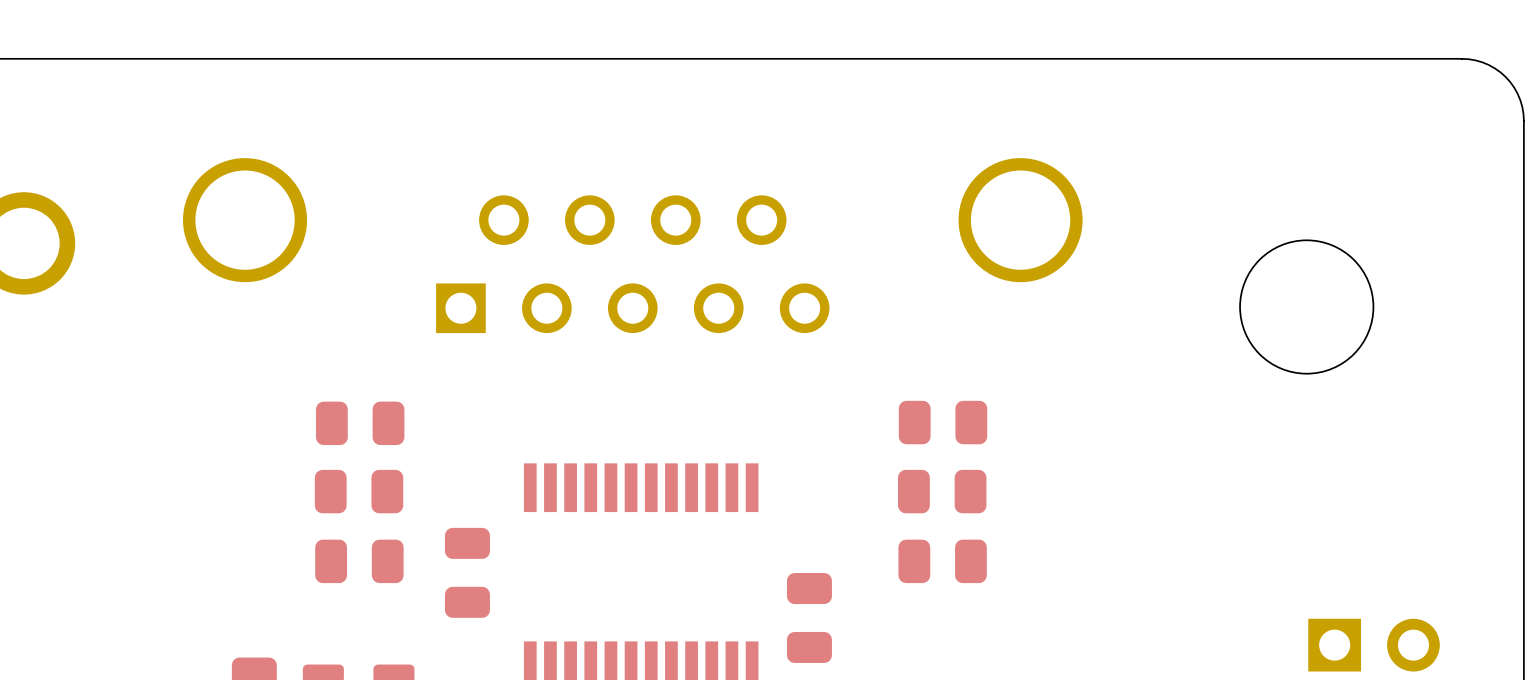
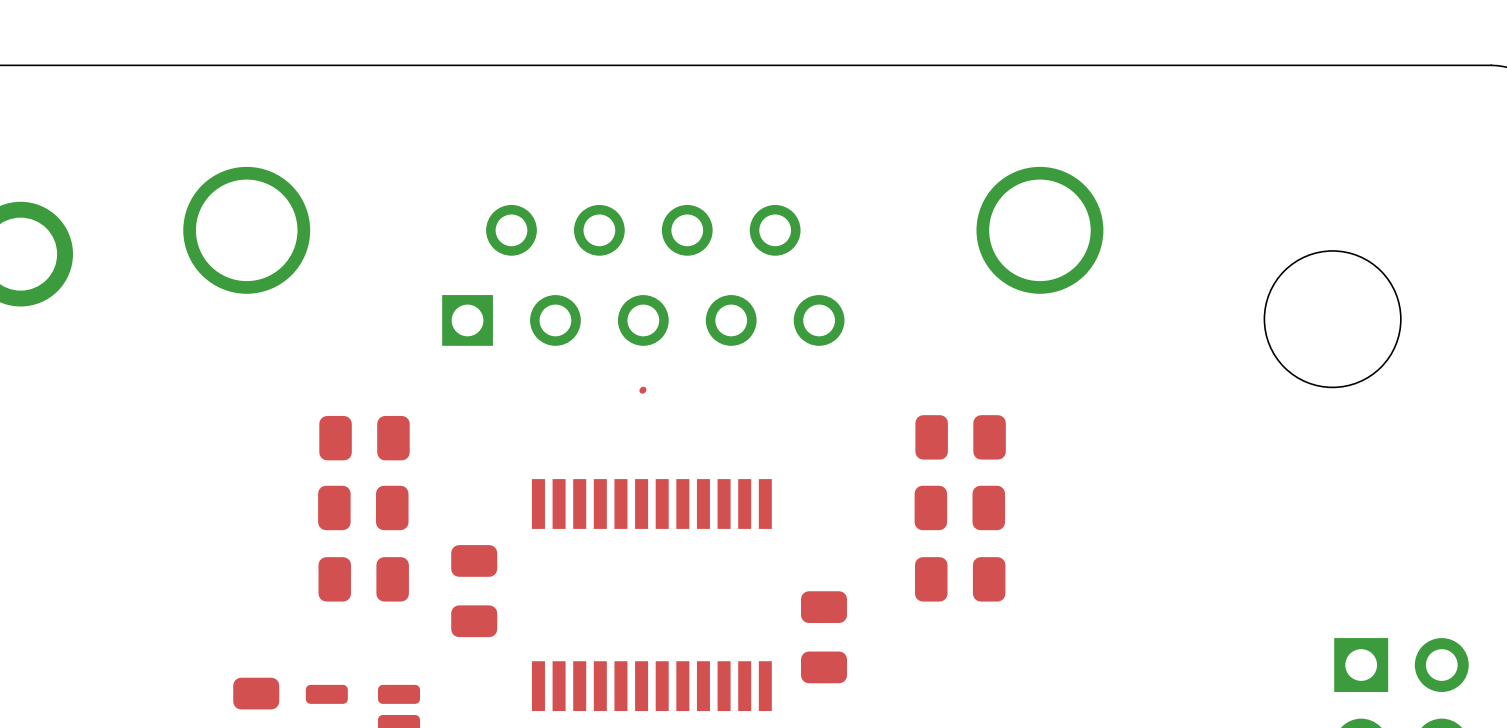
top track: none -> (643, 389) (642, 390)

